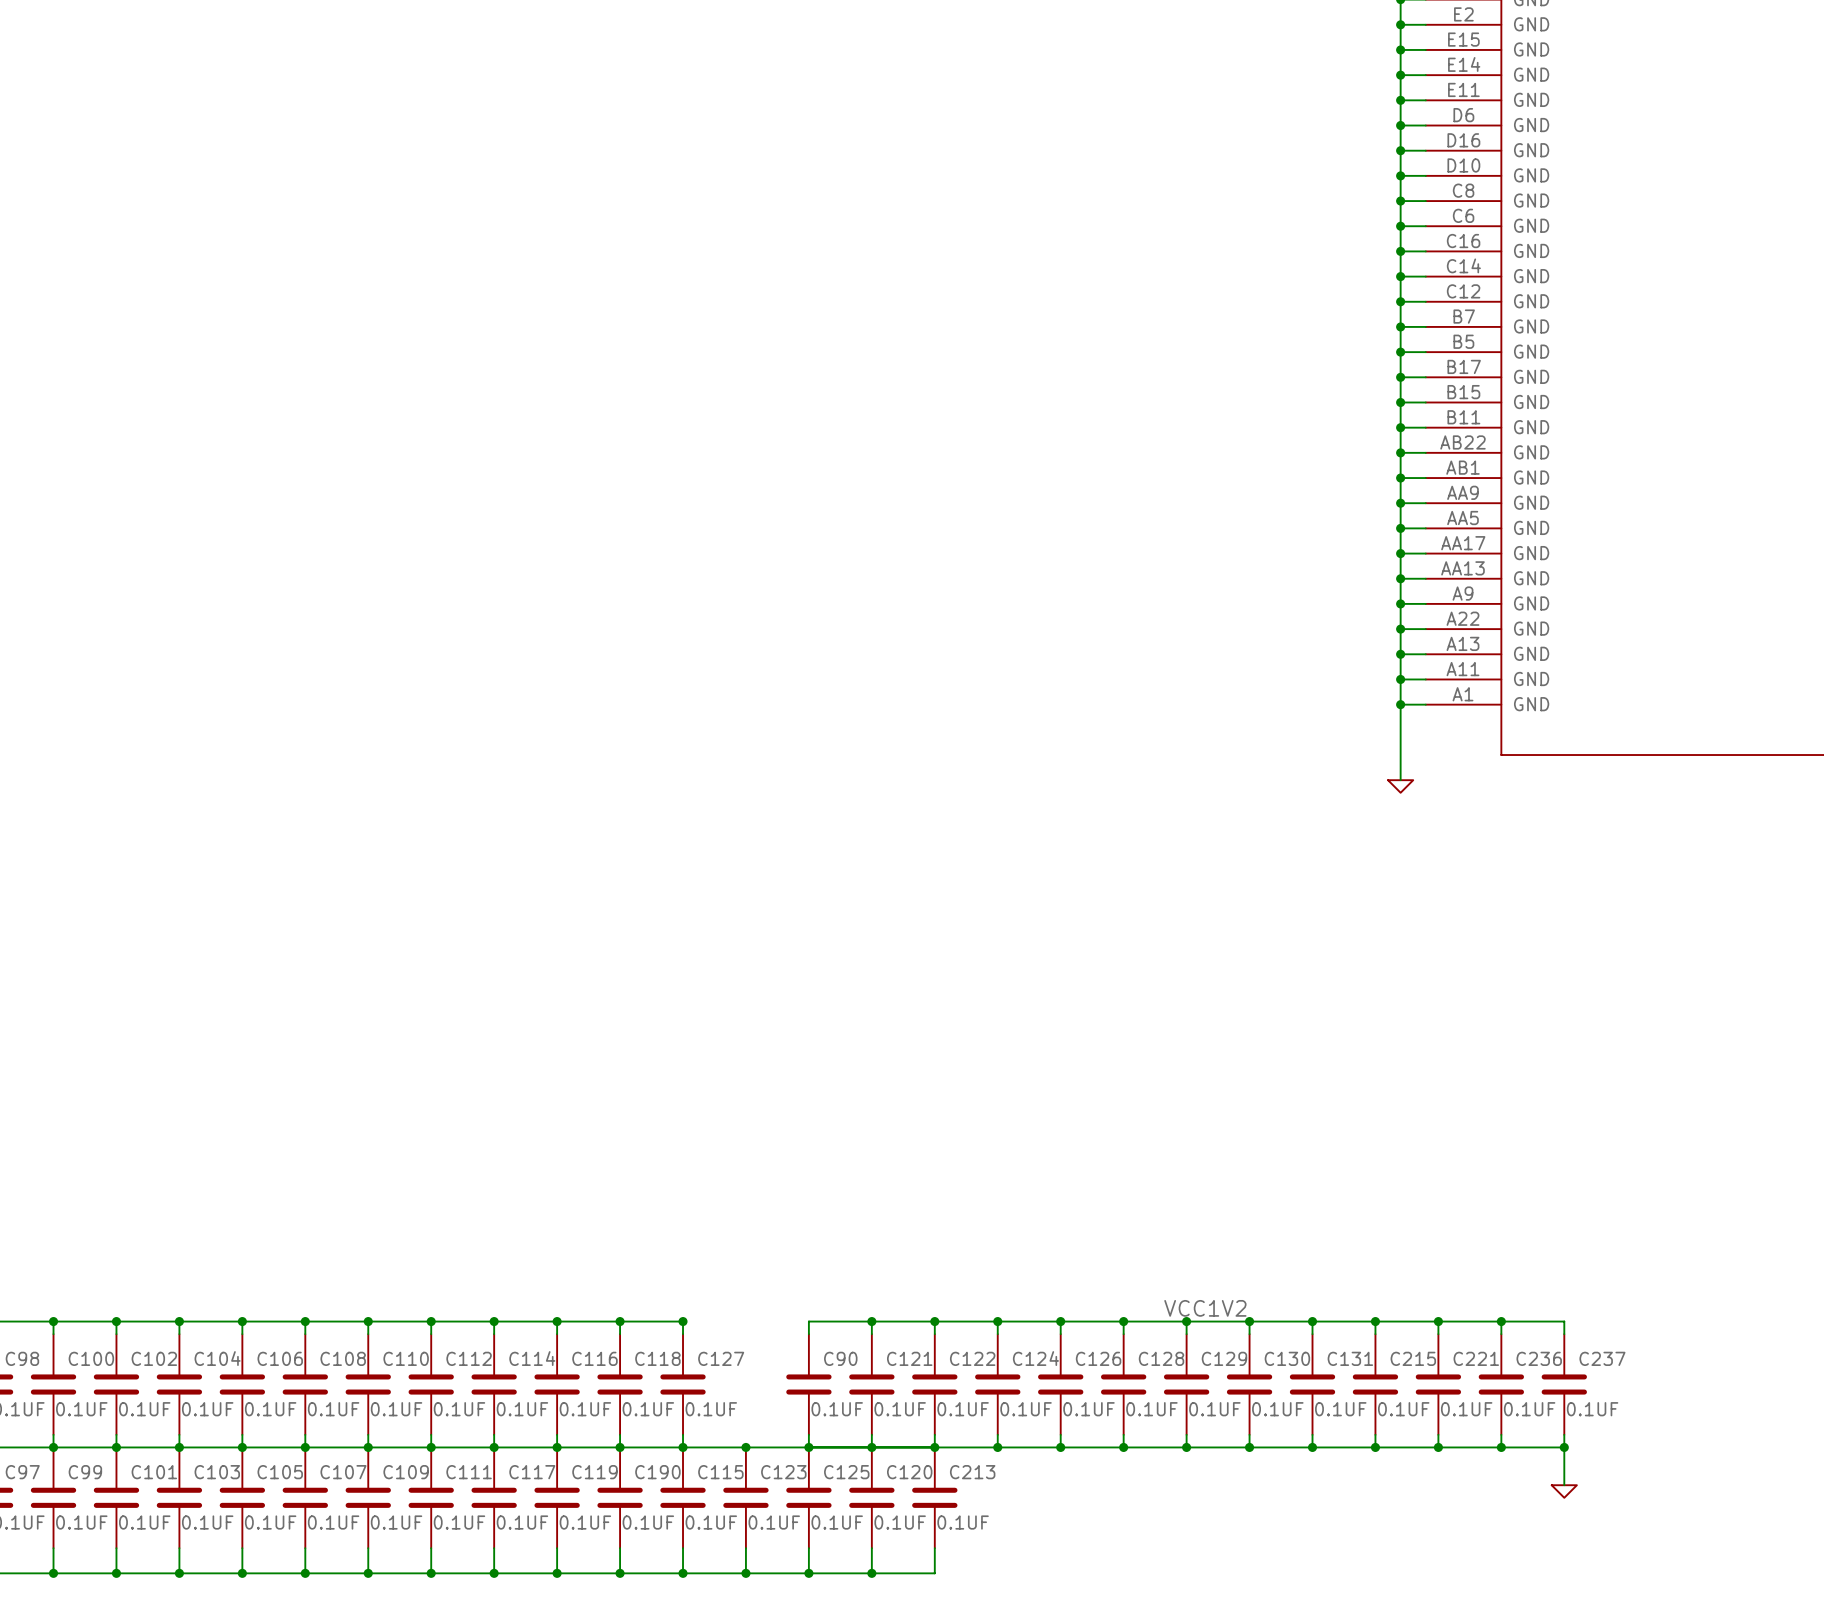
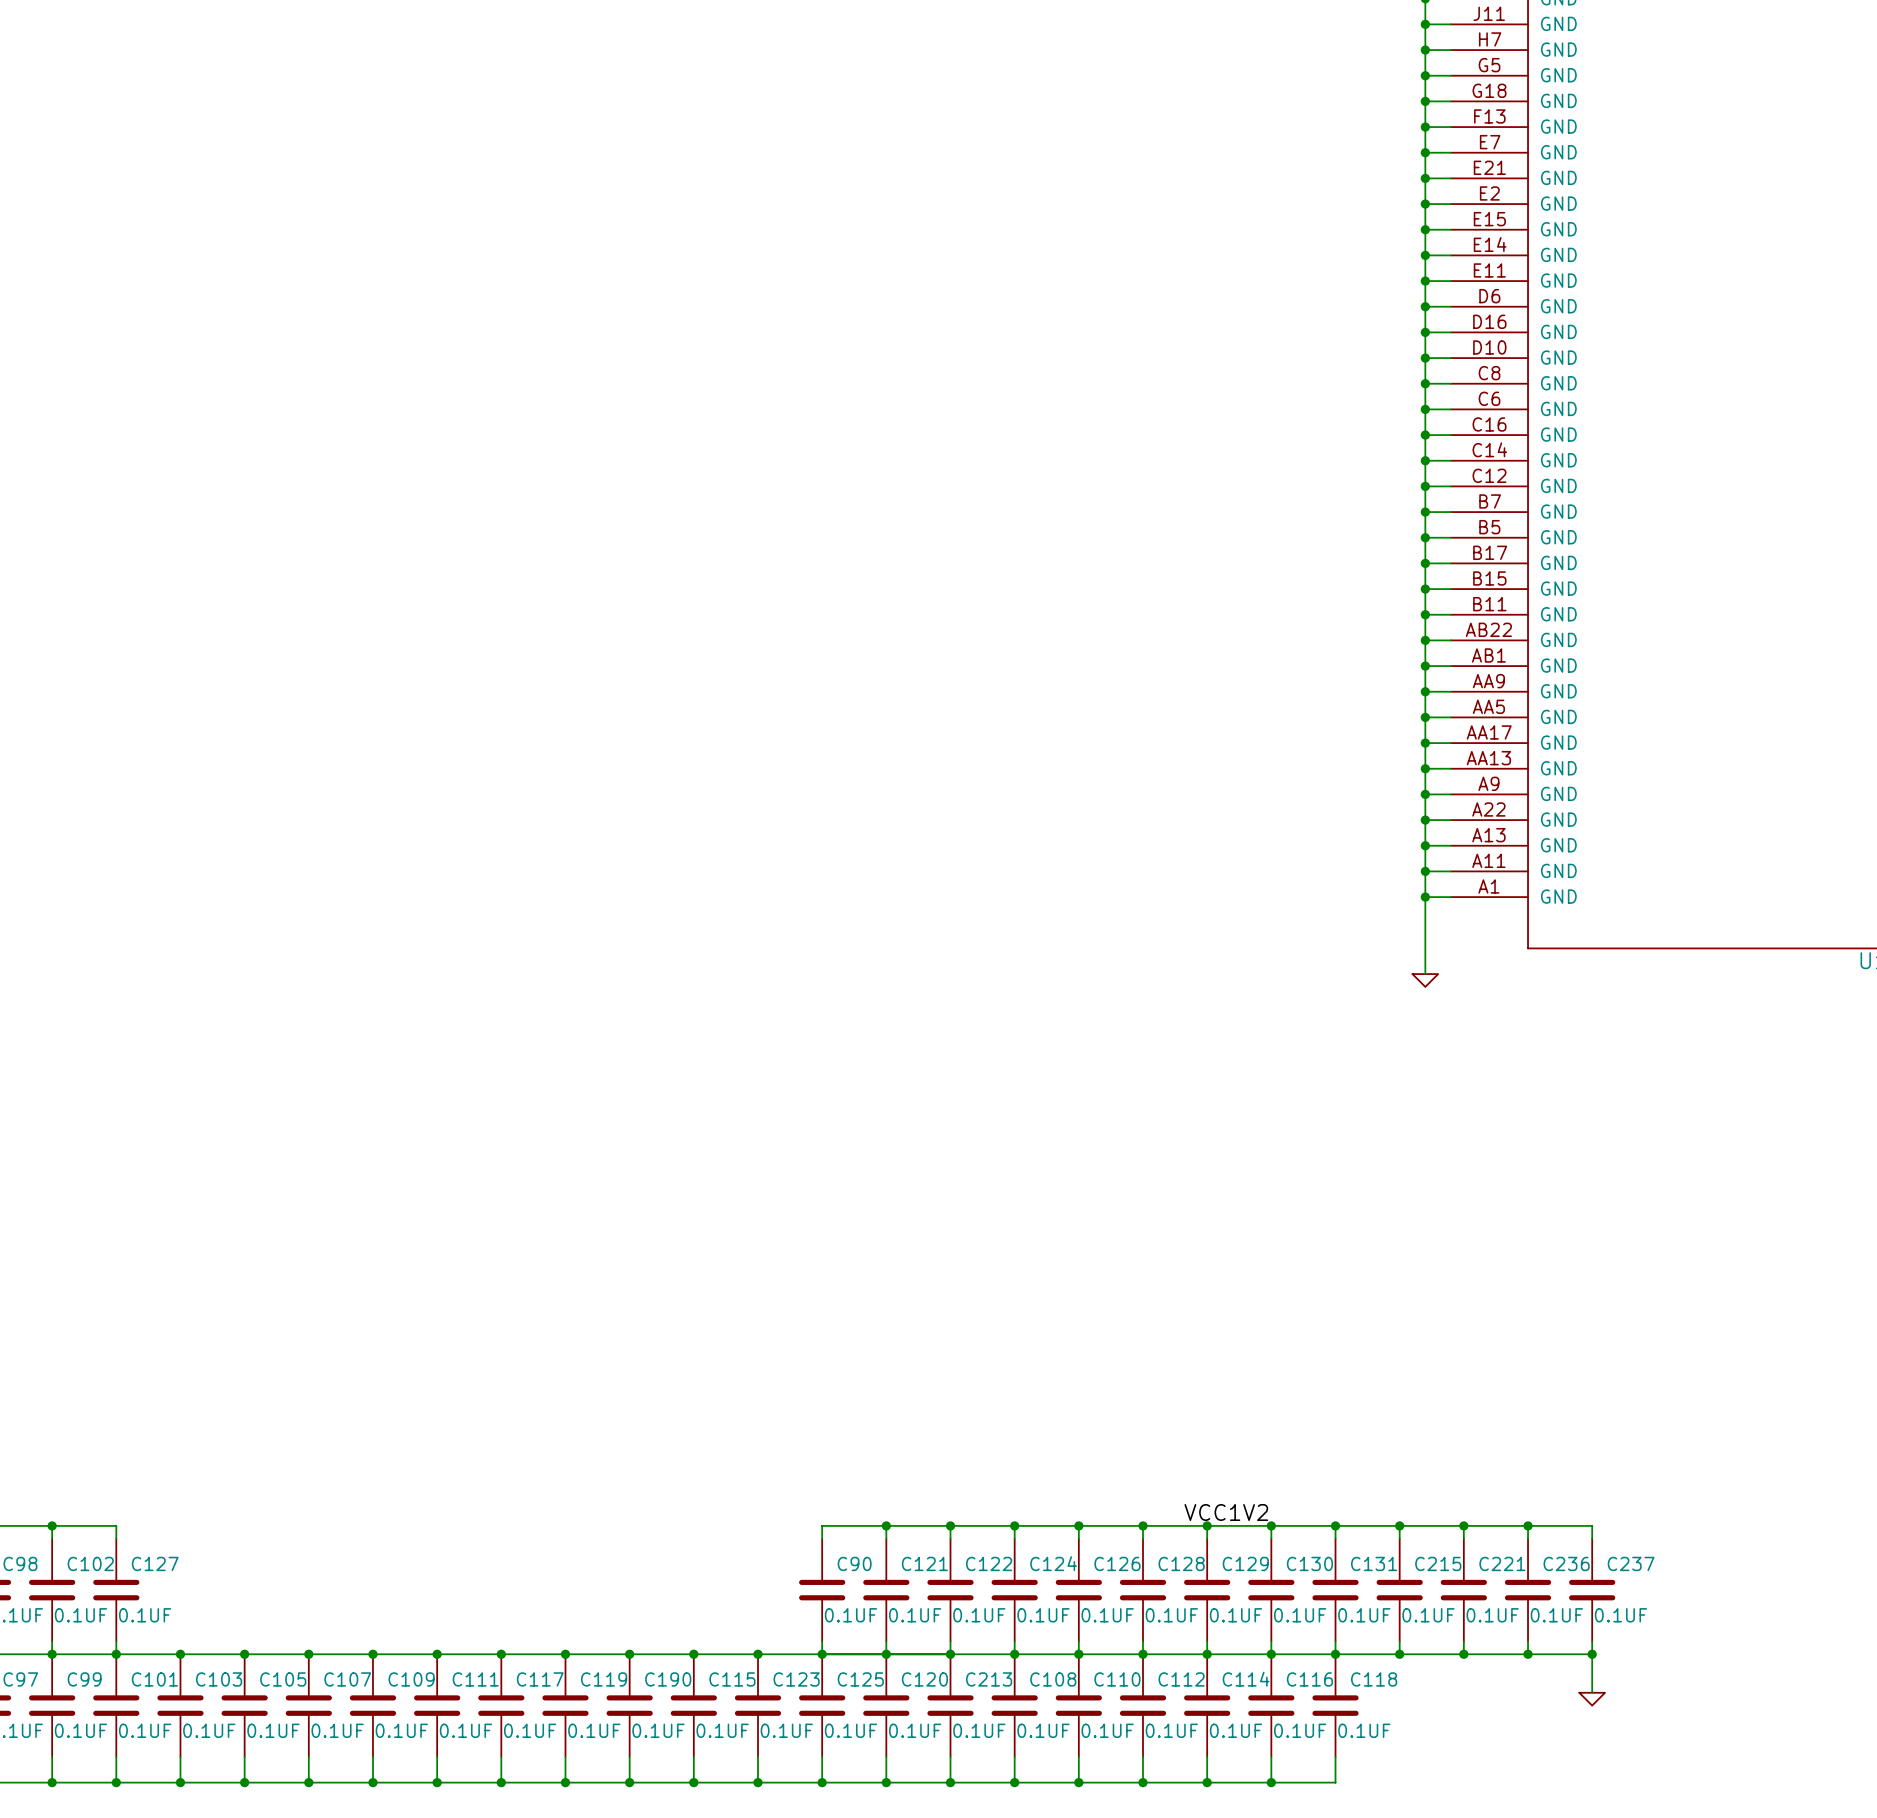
wire: (116, 1321) (683, 1321) (683, 1334) -> none
junction: (116, 1321) -> none
wire: (179, 1321) (179, 1334) -> none
junction: (179, 1321) -> none
wire: (242, 1321) (242, 1334) -> none
junction: (242, 1321) -> none
wire: (305, 1321) (305, 1334) -> none
junction: (305, 1321) -> none
wire: (368, 1321) (368, 1334) -> none
junction: (368, 1321) -> none
wire: (431, 1321) (431, 1334) -> none
junction: (431, 1321) -> none
wire: (494, 1321) (494, 1334) -> none
junction: (494, 1321) -> none
wire: (557, 1321) (557, 1334) -> none
junction: (557, 1321) -> none
wire: (620, 1321) (620, 1334) -> none
junction: (620, 1321) -> none
junction: (683, 1321) -> none
C100 name: C100 (91, 1358) -> C102 (90, 1563)
C102 name: C102 (154, 1358) -> C127 (155, 1563)
C104: 0.1UF (179, 1384) -> none
C106: 0.1UF (242, 1384) -> none
C108 position: (305, 1384) -> (1014, 1705)
C110 position: (368, 1384) -> (1078, 1705)
C112 position: (431, 1384) -> (1143, 1705)
C114 position: (494, 1384) -> (1207, 1705)
C116 position: (557, 1384) -> (1271, 1705)
C118 position: (620, 1384) -> (1335, 1705)
C127: 0.1UF (683, 1384) -> none
wire: (179, 1434) (179, 1447) -> none
wire: (242, 1434) (242, 1447) -> none
wire: (305, 1434) (305, 1447) -> none
wire: (368, 1434) (368, 1447) -> none
wire: (431, 1434) (431, 1447) -> none
wire: (494, 1434) (494, 1447) -> none
wire: (557, 1434) (557, 1447) -> none
wire: (620, 1434) (620, 1447) -> none
wire: (683, 1434) (683, 1447) -> none
wire: none -> (1014, 1756) (1014, 1782)
wire: none -> (1078, 1756) (1078, 1782)
wire: none -> (1143, 1756) (1143, 1782)
wire: none -> (1207, 1756) (1207, 1782)
wire: none -> (1271, 1756) (1271, 1782)
wire: none -> (1335, 1756) (1335, 1782) (950, 1782)
junction: none -> (950, 1782)
junction: none -> (1014, 1782)
junction: none -> (1078, 1782)
junction: none -> (1143, 1782)
junction: none -> (1207, 1782)
junction: none -> (1271, 1782)

